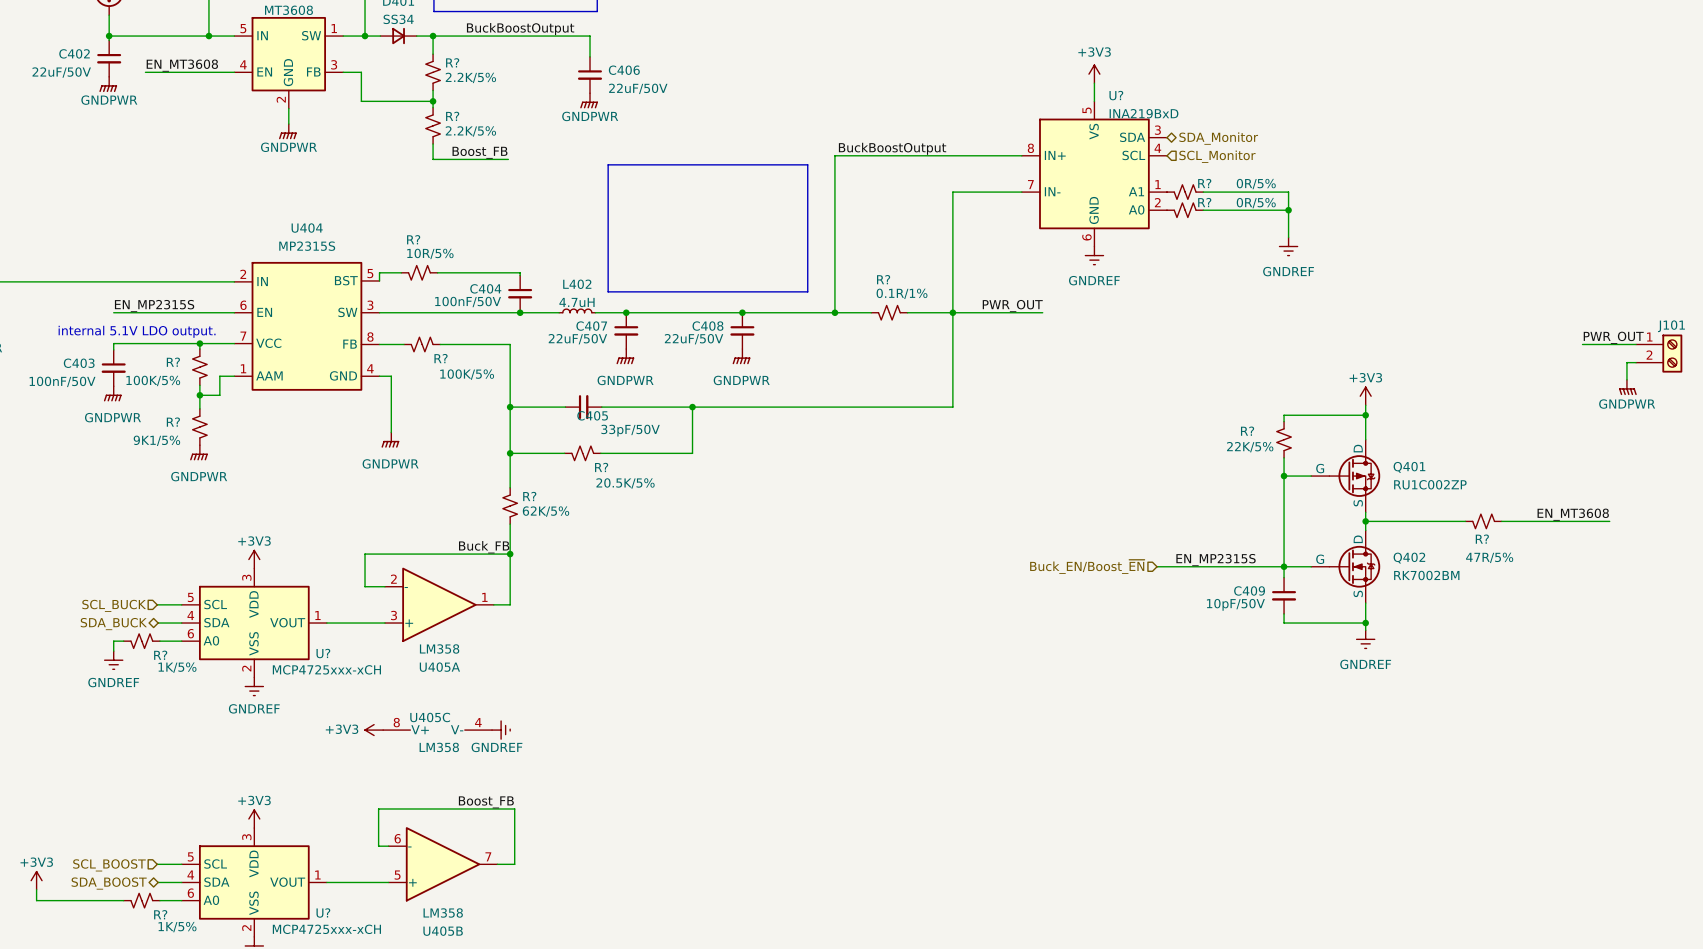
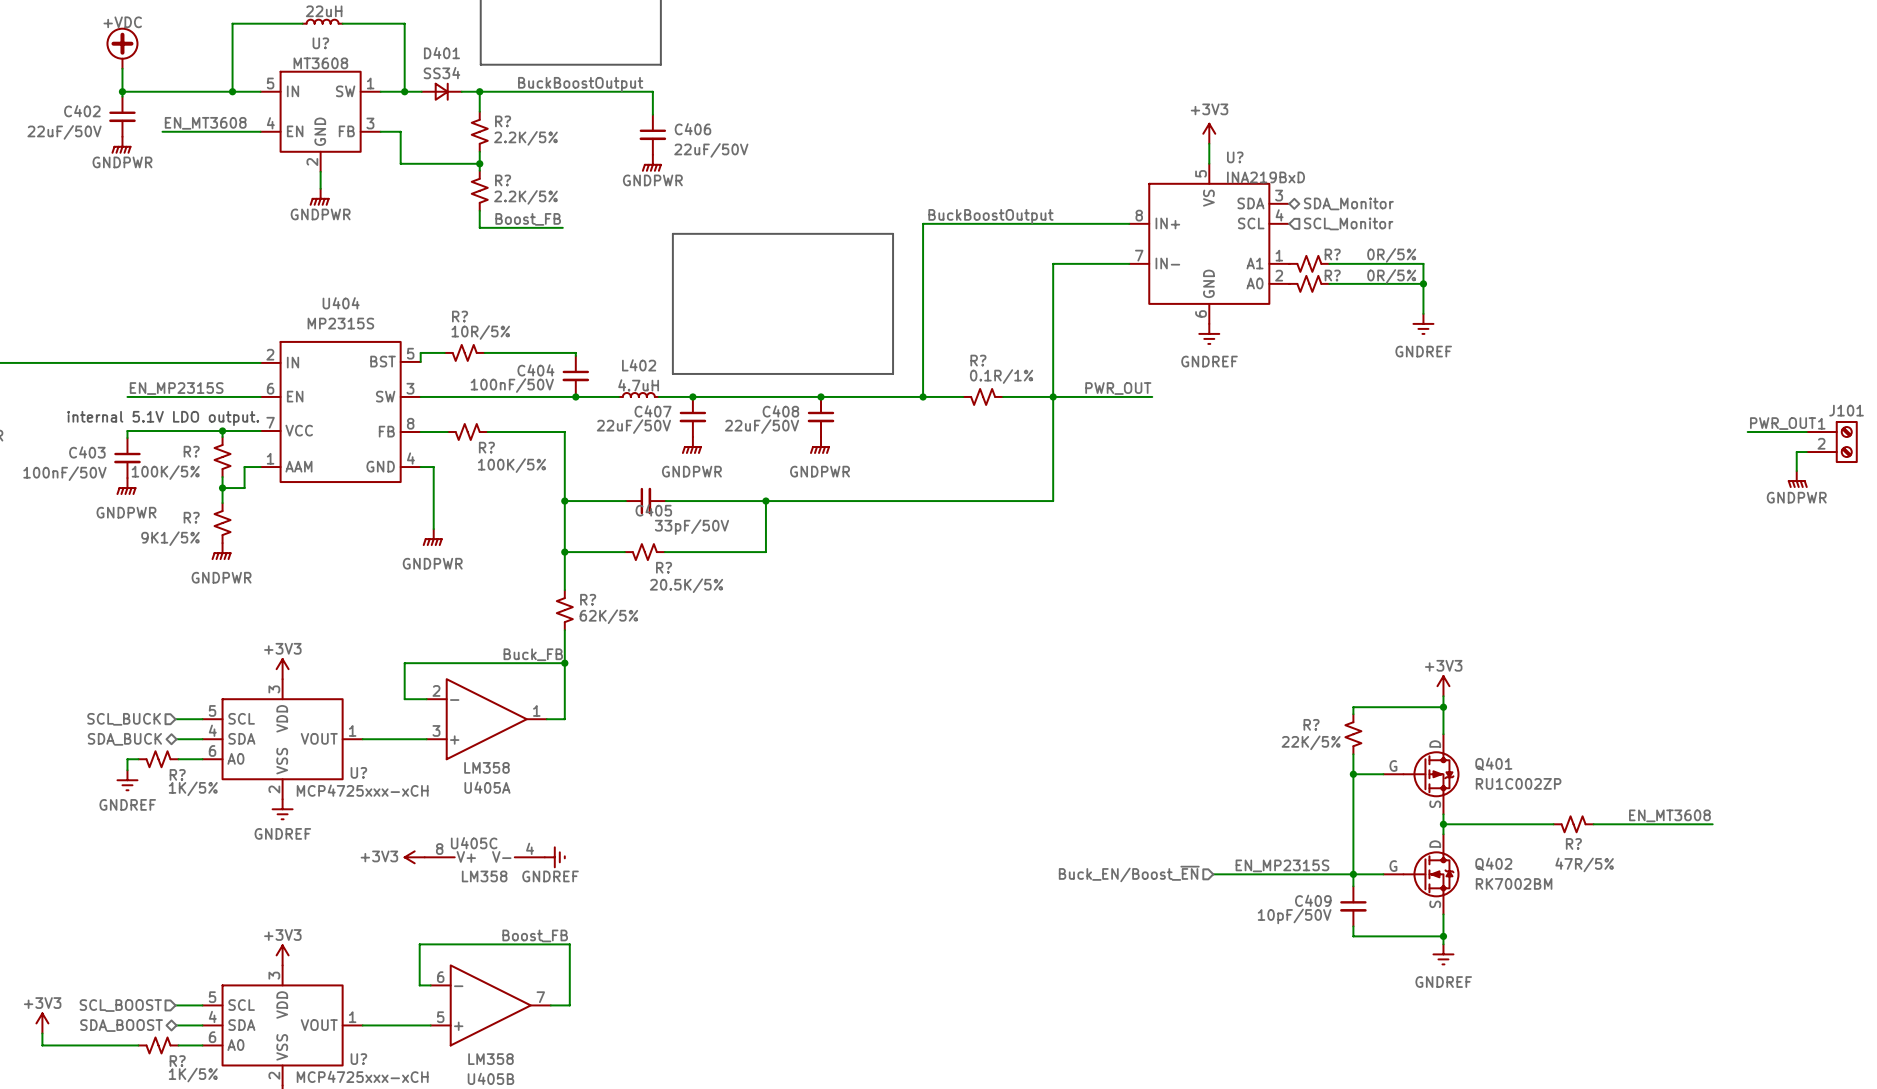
power symbol: +3V3 (1365, 396) -> none
wire: (1365, 405) (1365, 439) -> none
wire: (1365, 415) (1284, 415) (1284, 421) -> none
junction: (1365, 415) -> none
R?: 22K/5% (1284, 439) -> none
wire: (1284, 457) (1284, 577) -> none
wire: (1284, 476) (1311, 476) -> none
junction: (1284, 476) -> none
Q401 position: (1345, 476) -> (1421, 774)
wire: (1365, 512) (1365, 530) -> none
label: EN_MT3608 (1573, 514) -> none
wire: (1365, 521) (1465, 521) -> none
junction: (1365, 521) -> none
R?: 47R/5% (1483, 521) -> none
wire: (1501, 521) (1609, 521) -> none
label: EN_MP2315S (1216, 560) -> none
hierarchical label: Buck_EN/Boost_~{EN} (1087, 566) -> none
wire: (1157, 566) (1311, 566) -> none
junction: (1284, 566) -> none
Q402 position: (1345, 566) -> (1421, 874)
power symbol: none -> +3V3 (1443, 686)
wire: none -> (1443, 696) (1443, 734)
wire: none -> (1443, 707) (1353, 707) (1353, 714)
junction: none -> (1443, 707)
C409 position: (1284, 595) -> (1353, 906)
wire: (1365, 603) (1365, 630) -> none
wire: (1284, 613) (1284, 623) (1365, 623) -> none
R?: none -> 22K/5% (1353, 734)
junction: (1365, 623) -> none
wire: none -> (1353, 754) (1353, 886)
power symbol: GNDREF (1365, 639) -> none
wire: none -> (1353, 774) (1383, 774)
junction: none -> (1353, 774)
wire: none -> (1443, 814) (1443, 834)
label: none -> EN_MT3608 (1669, 815)
wire: none -> (1443, 824) (1553, 824)
junction: none -> (1443, 824)
R?: none -> 47R/5% (1573, 824)
wire: none -> (1593, 824) (1712, 824)
label: none -> EN_MP2315S (1282, 865)
hierarchical label: none -> Buck_EN/Boost_~{EN} (1129, 874)
wire: none -> (1213, 874) (1383, 874)
junction: none -> (1353, 874)
wire: none -> (1443, 914) (1443, 944)
wire: none -> (1353, 926) (1353, 936) (1443, 936)
junction: none -> (1443, 936)
power symbol: none -> GNDREF (1443, 954)

